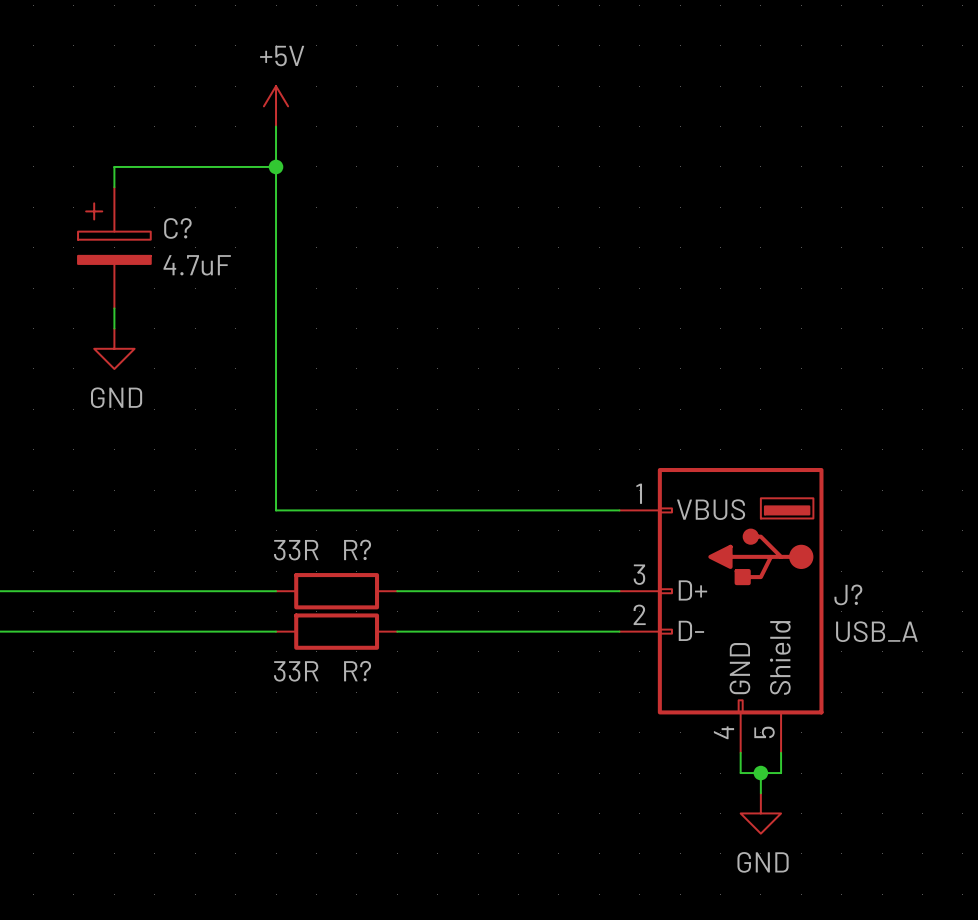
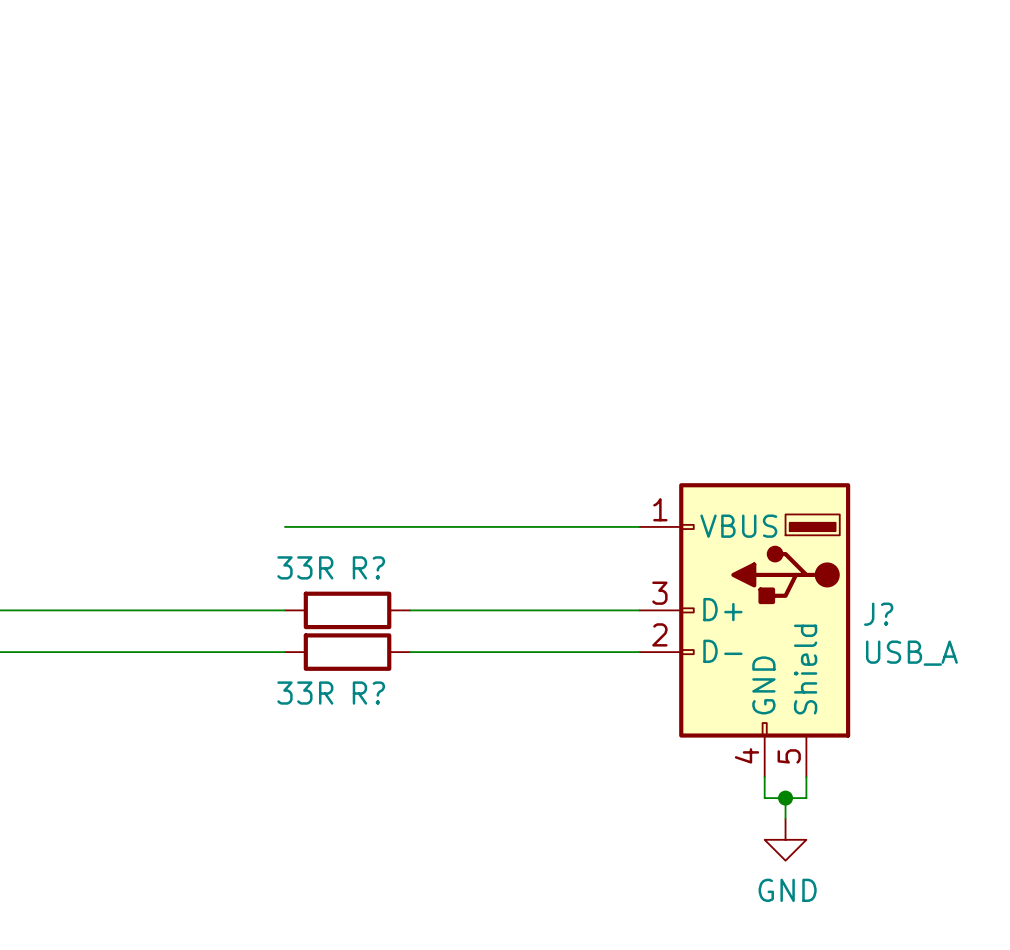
power symbol: +5V (276, 106) -> none
wire: (276, 126) (276, 510) -> none
wire: (276, 166) (114, 166) (114, 187) -> none
junction: (276, 166) -> none
C?: 4.7uF (114, 247) -> none
wire: (114, 308) (114, 328) -> none
power symbol: GND (114, 348) -> none

